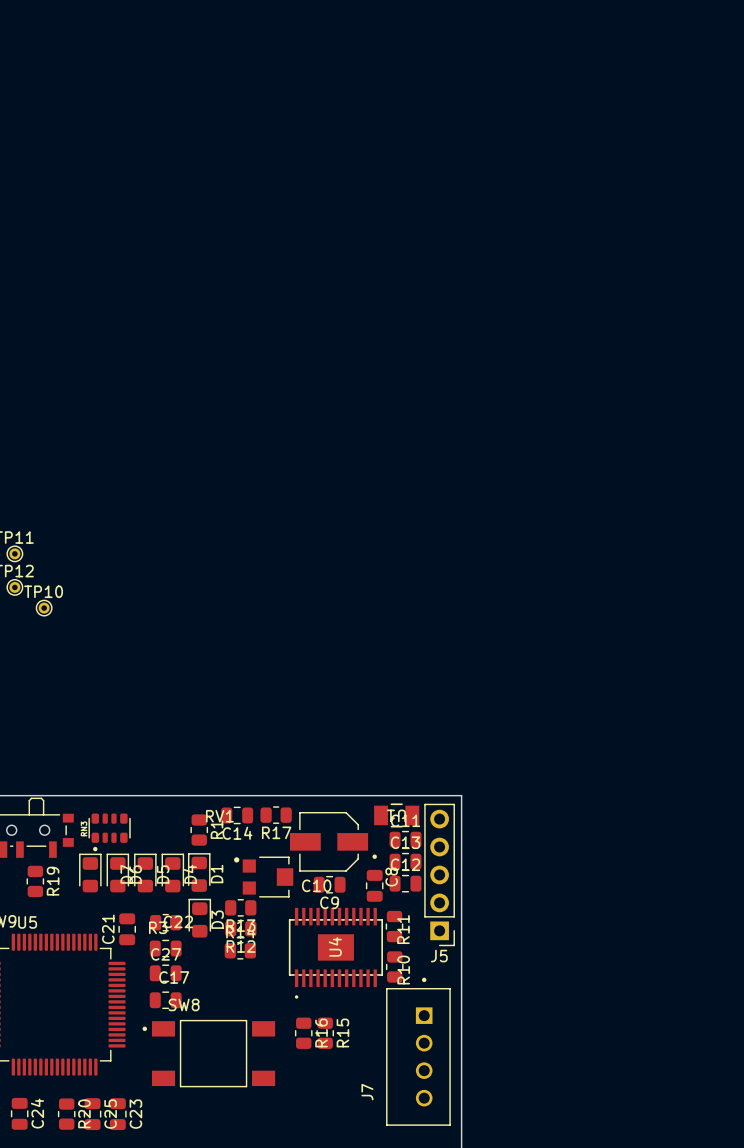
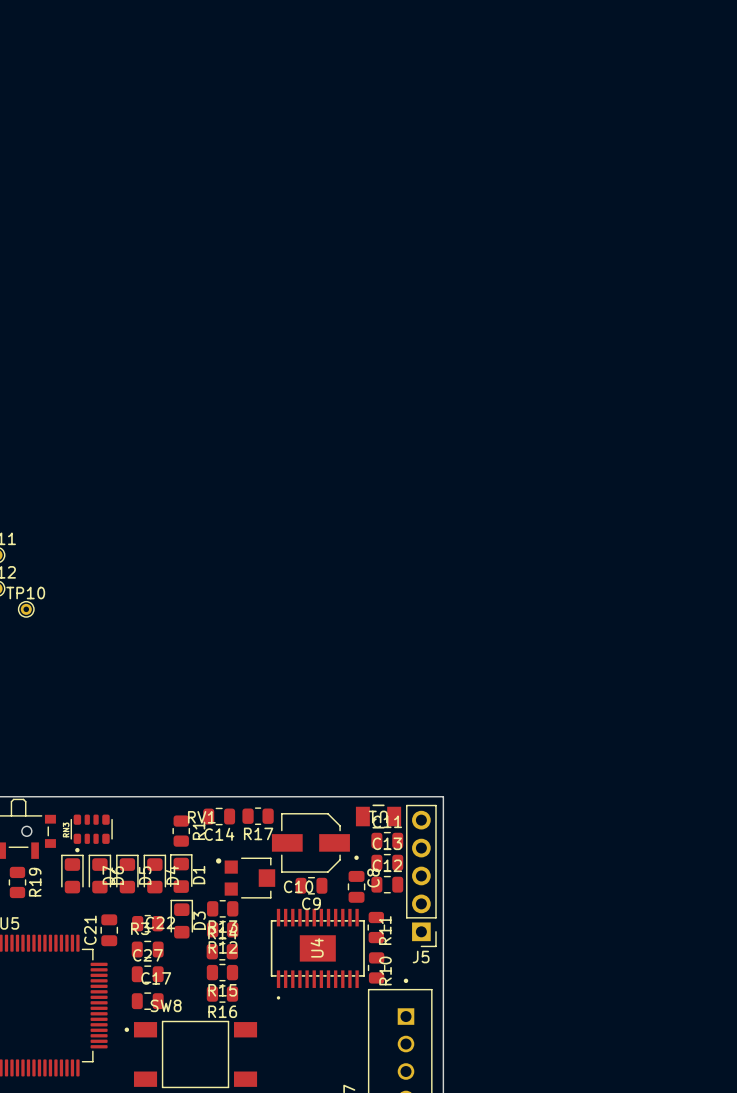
R16 rotation: 0° (303, 1033) -> 90° clockwise (222, 994)
R16 position: (303, 1033) -> (222, 994)
R15 rotation: 0° (325, 1033) -> 90° clockwise (222, 972)
R15 position: (325, 1033) -> (222, 972)

